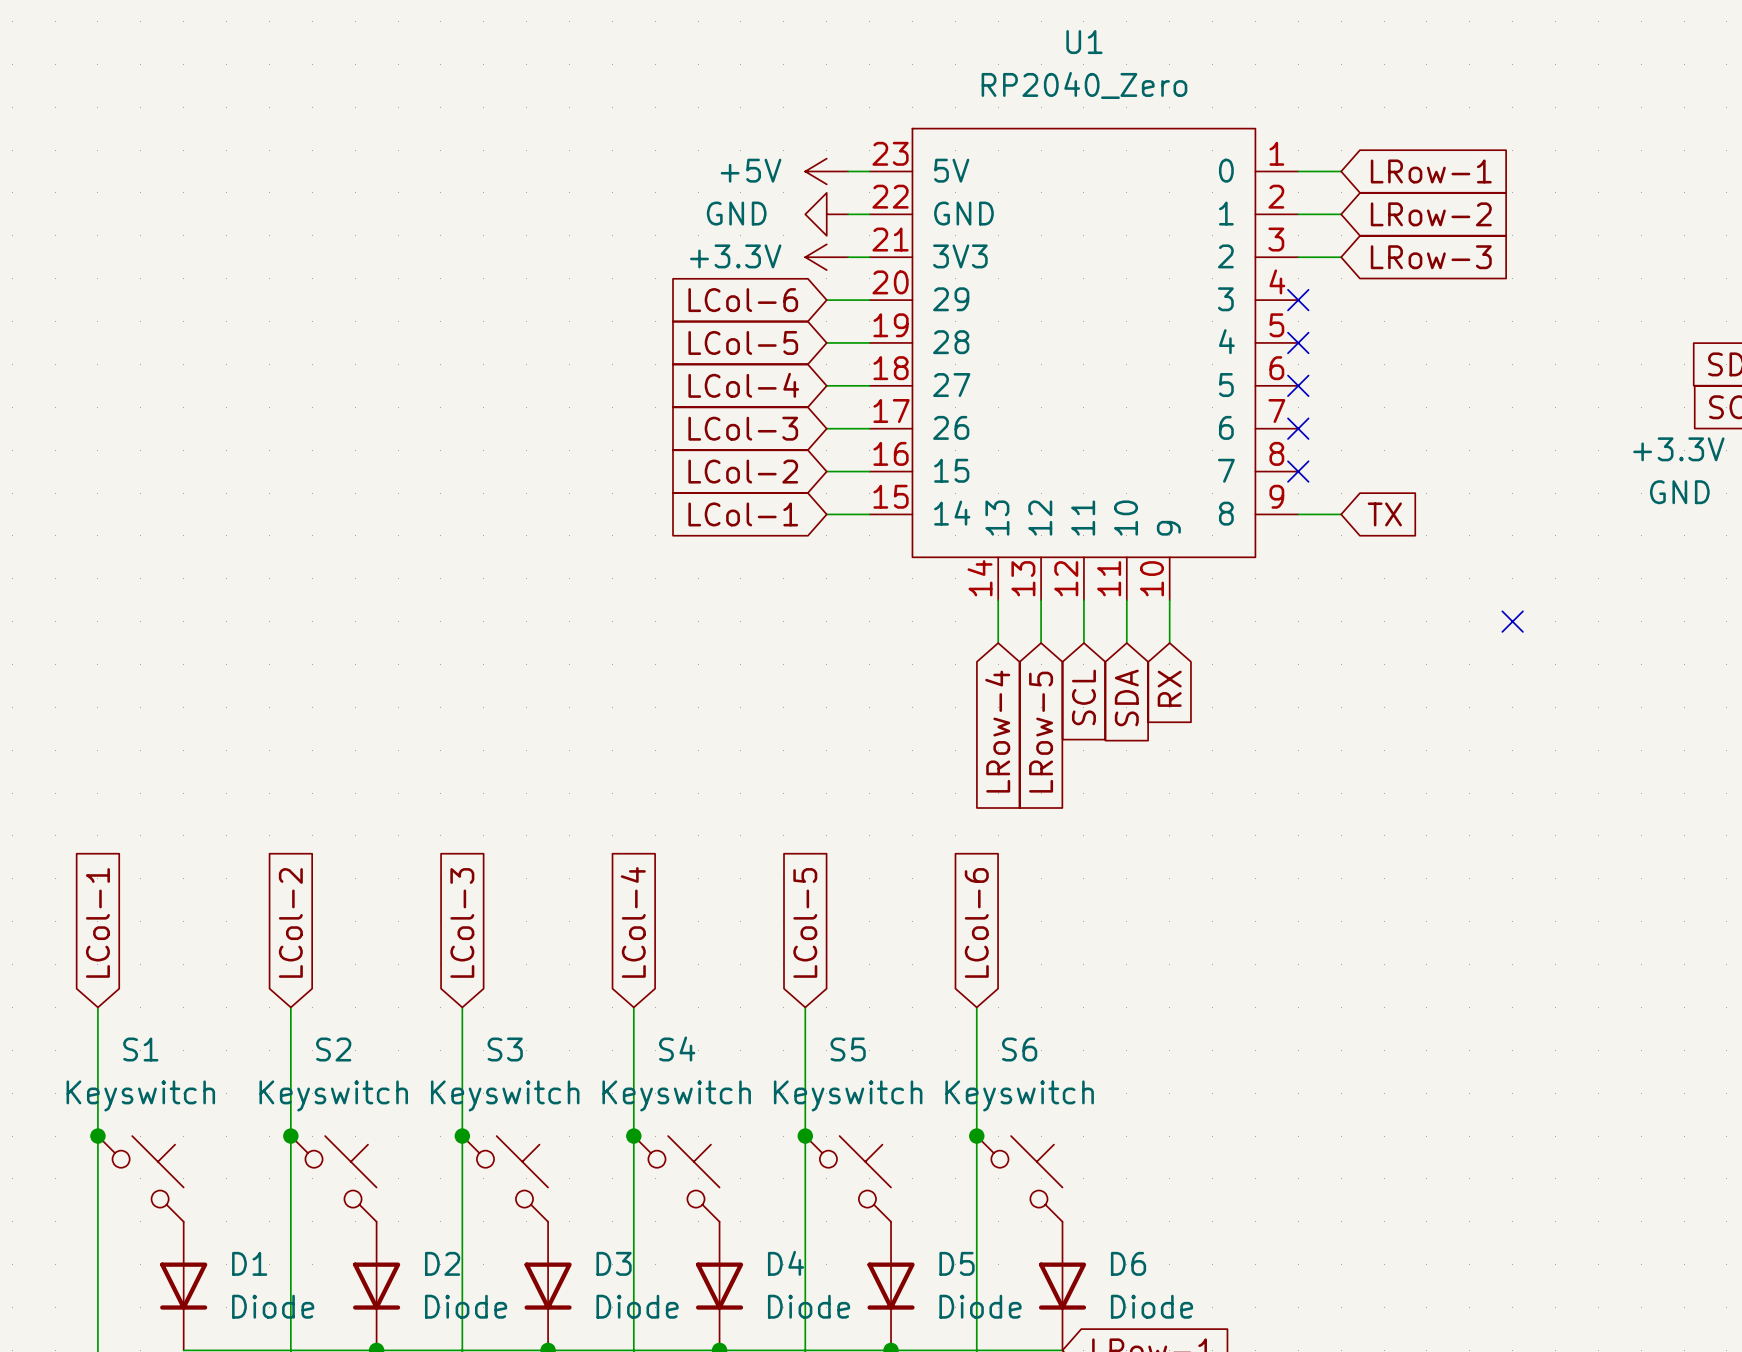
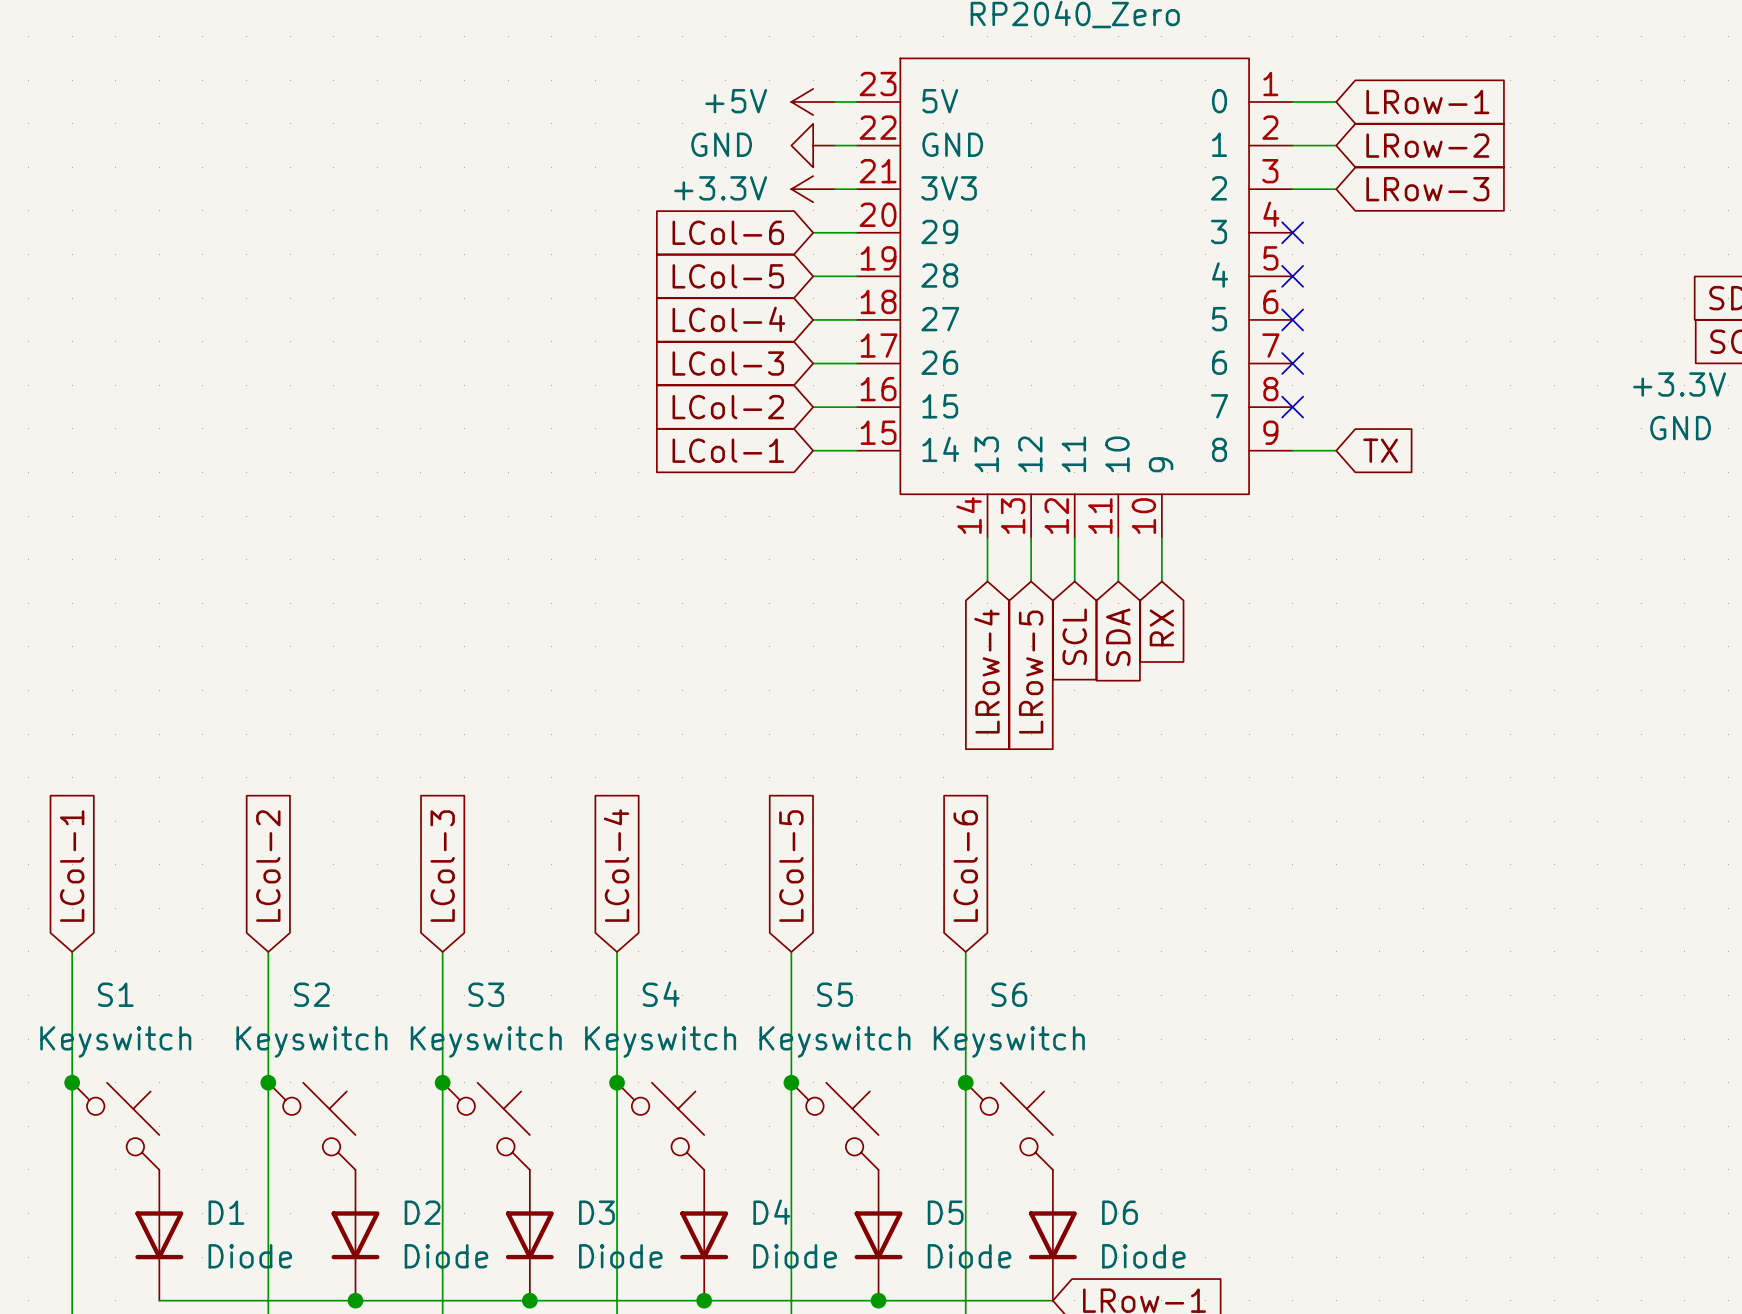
no-connect mark: (1512, 621) -> none

